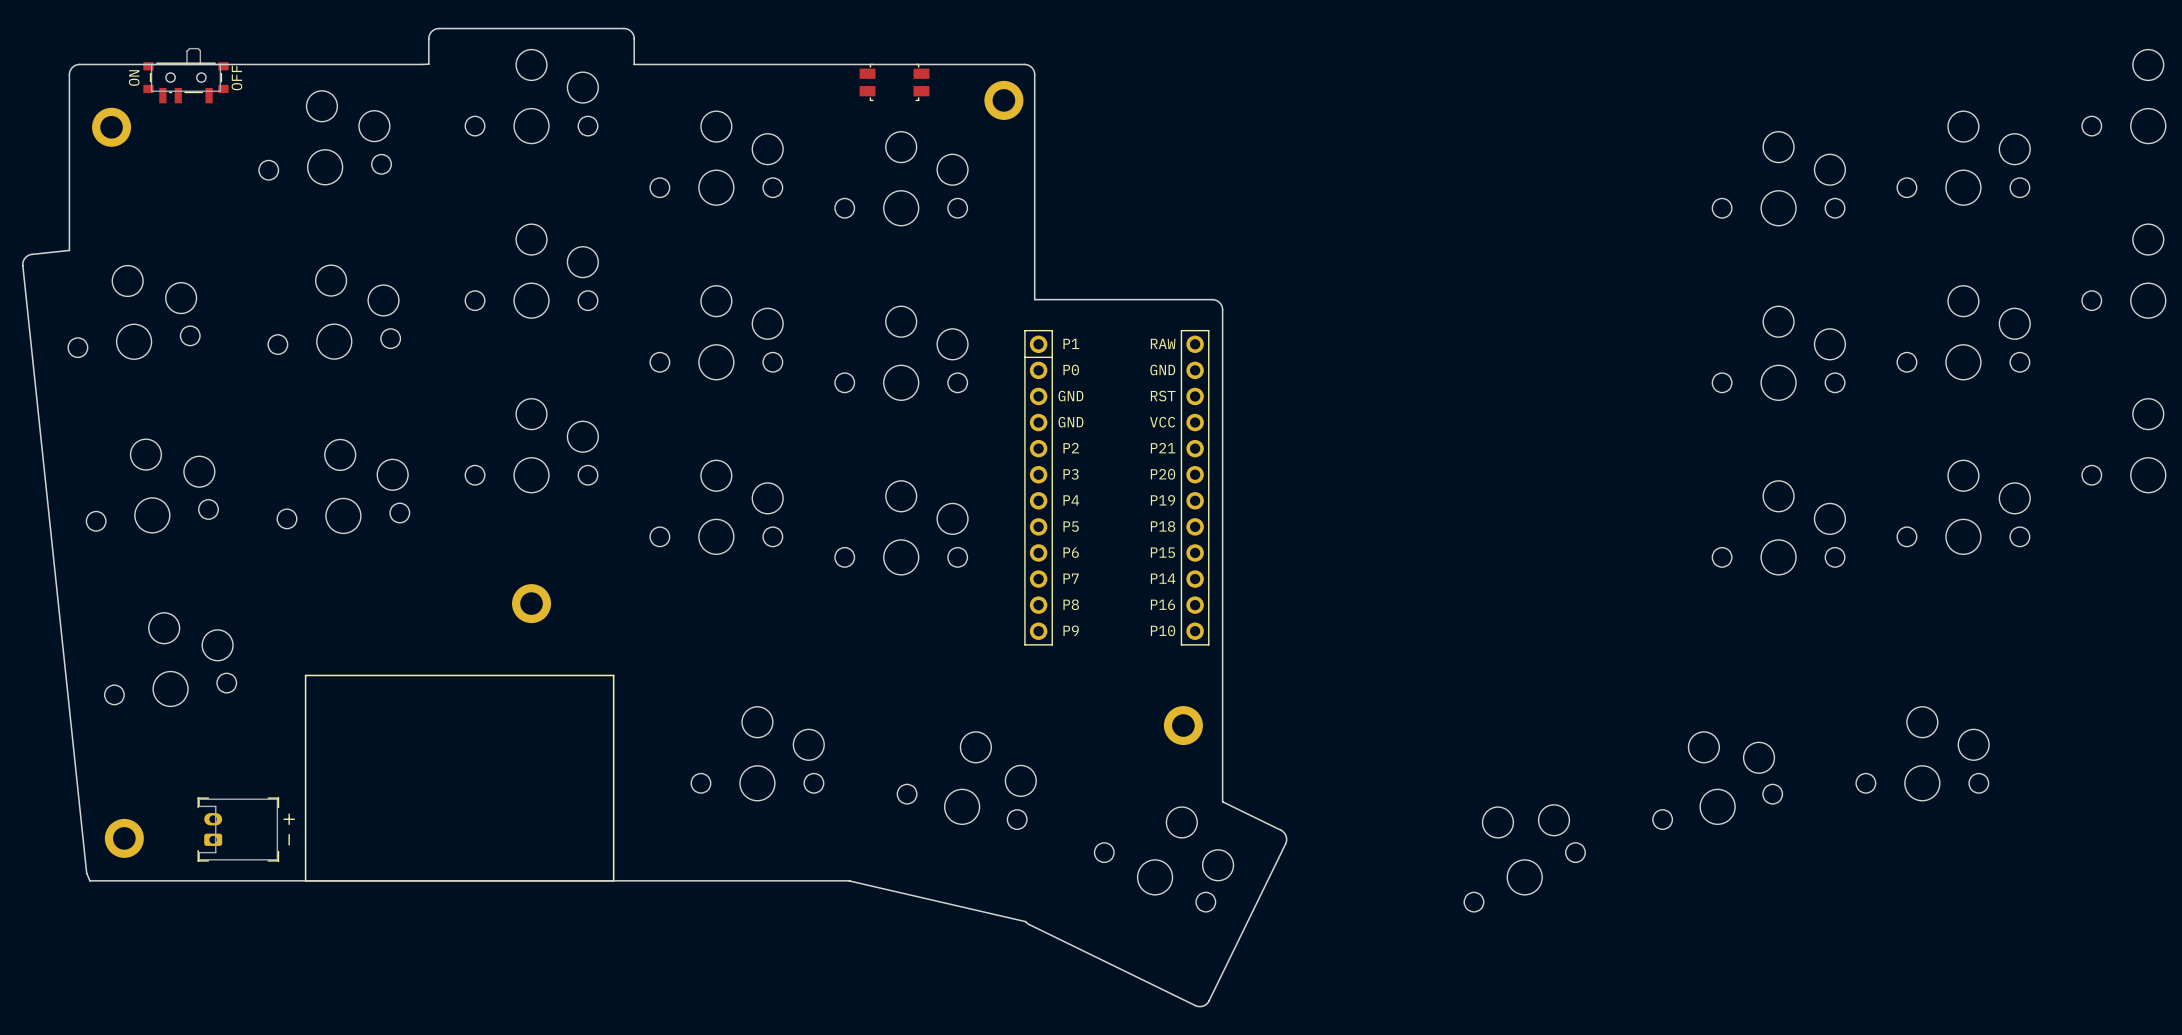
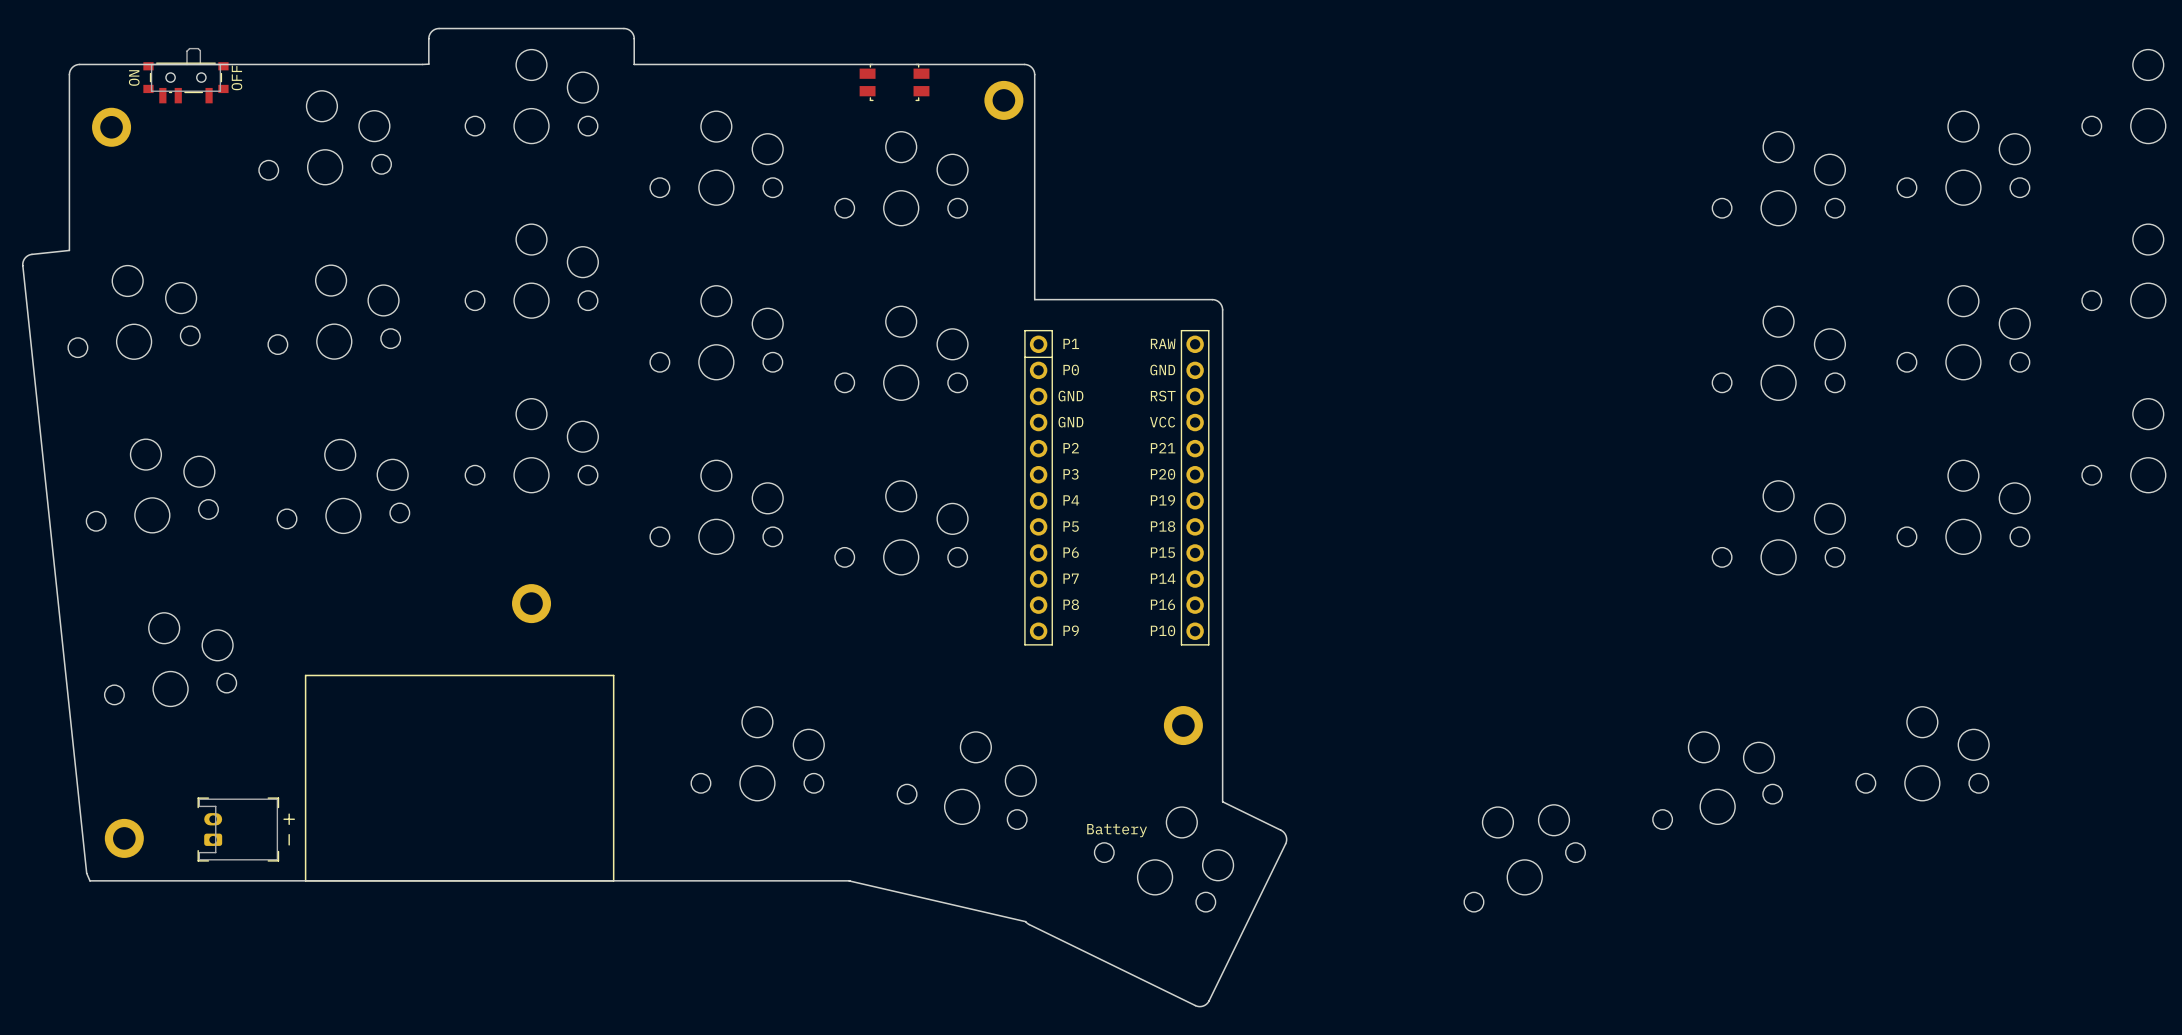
text: none -> Battery (1117, 830)

